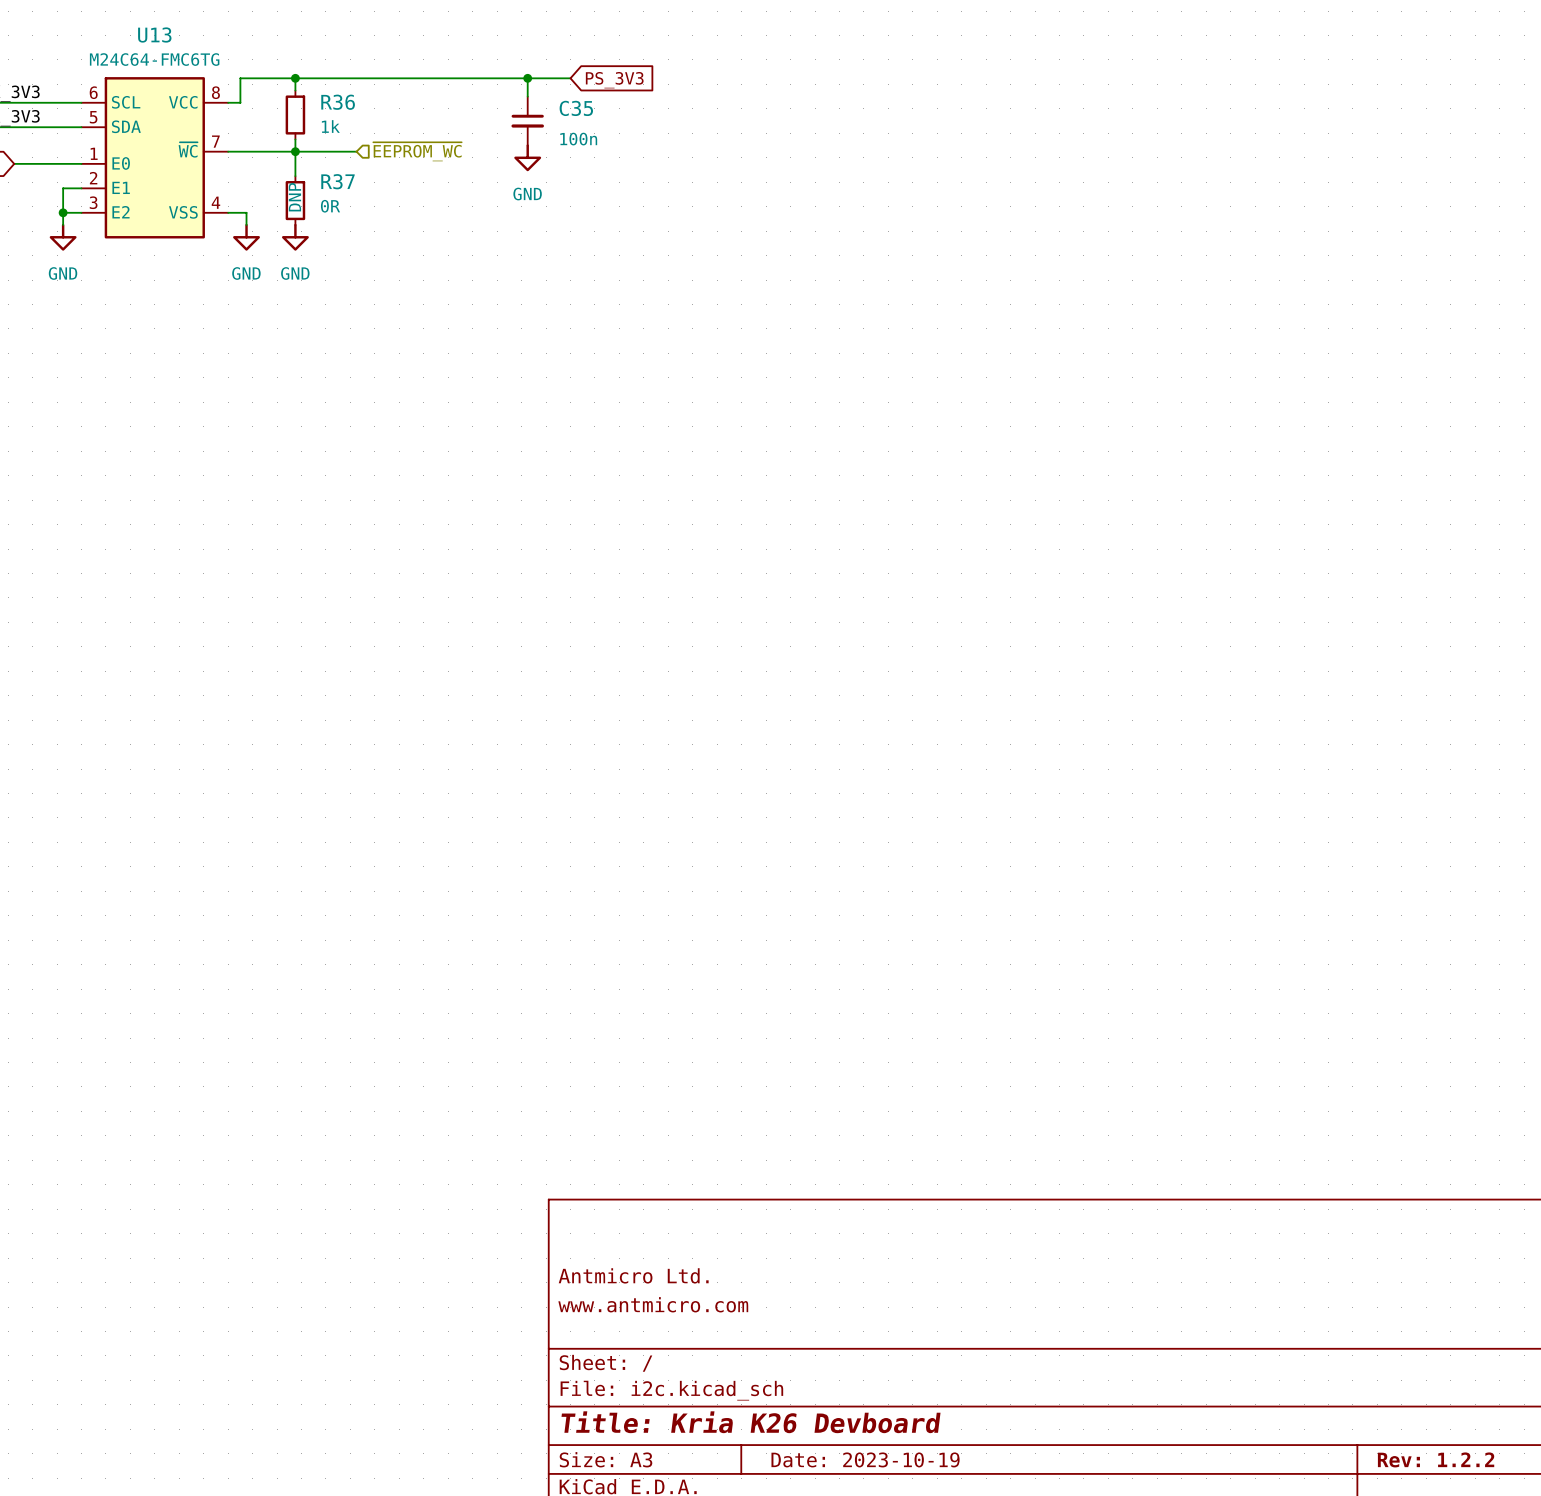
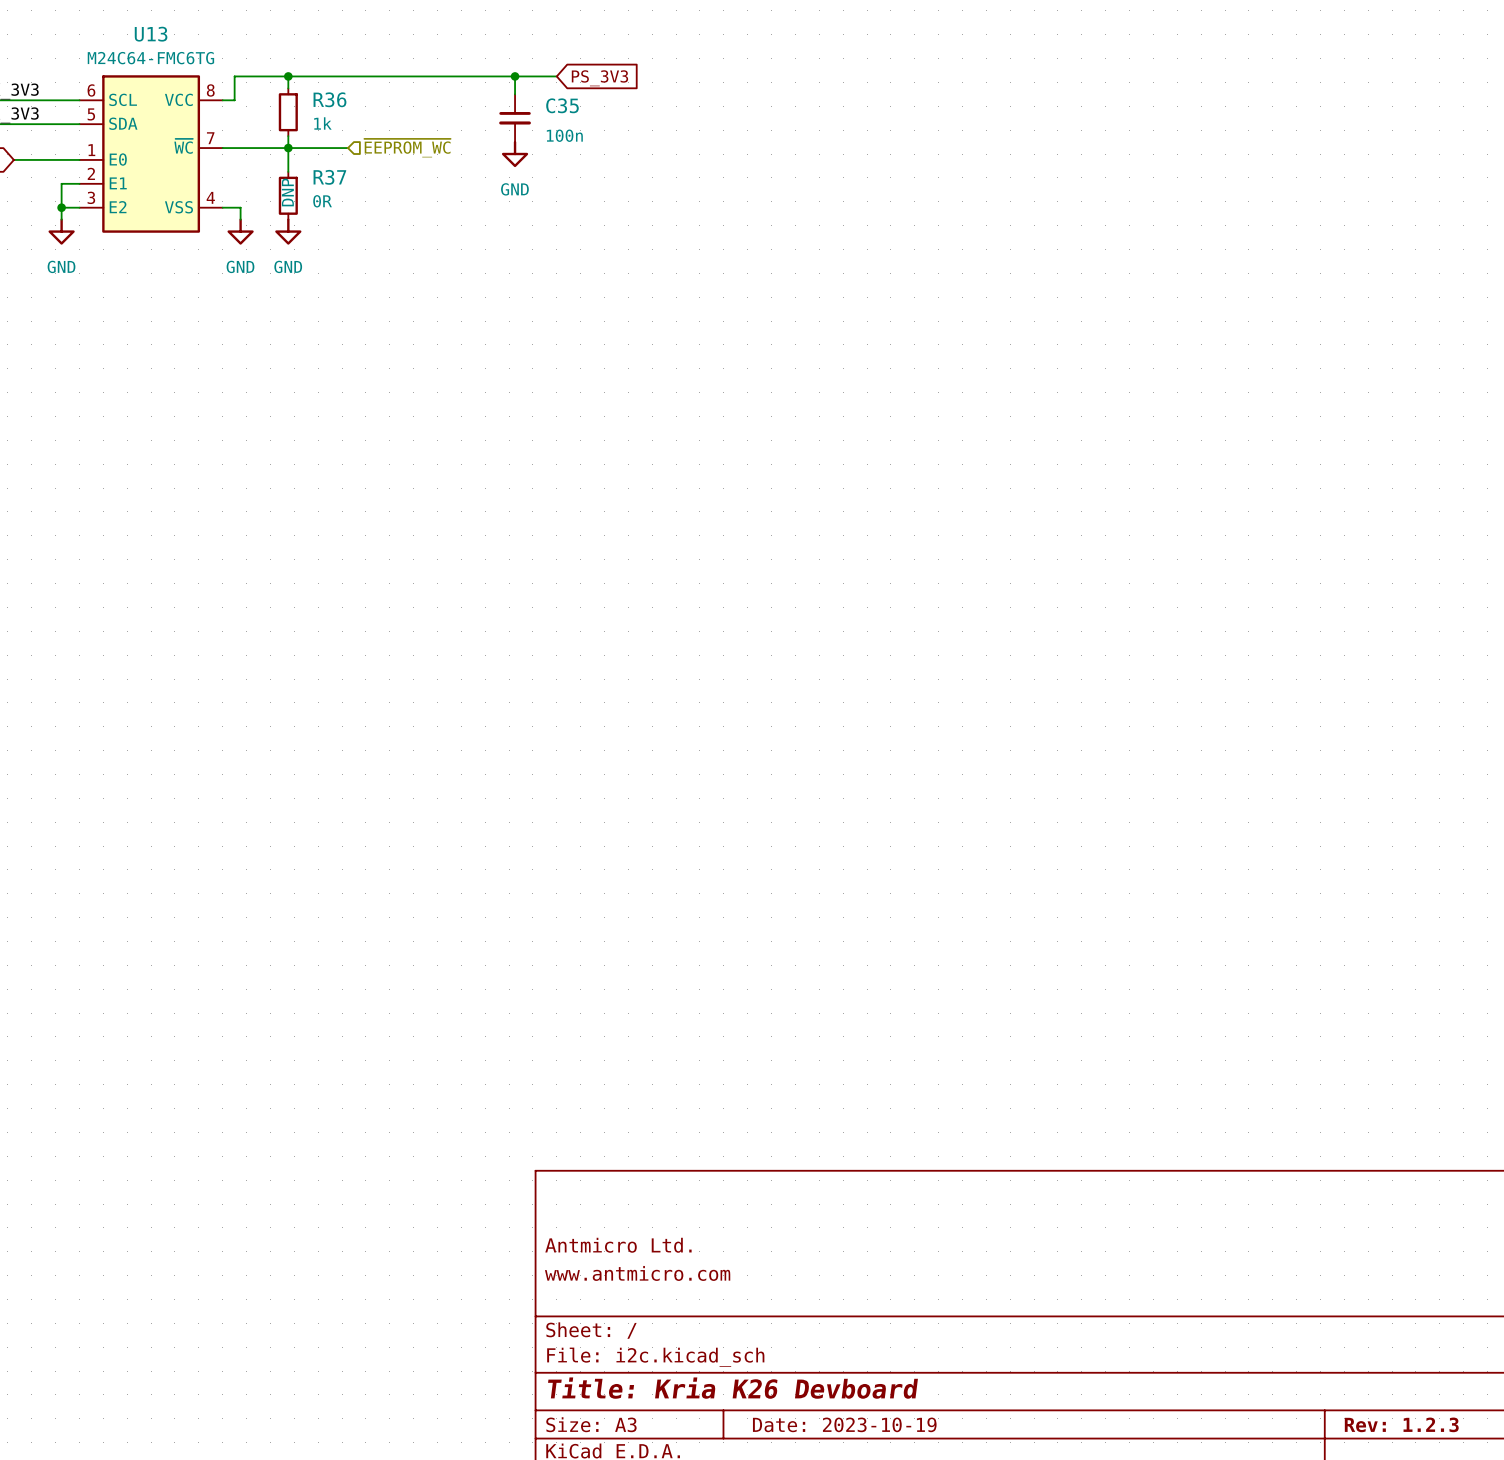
title block: Rev: 1.2.2 (1436, 1459) -> Rev: 1.2.3 (1401, 1424)

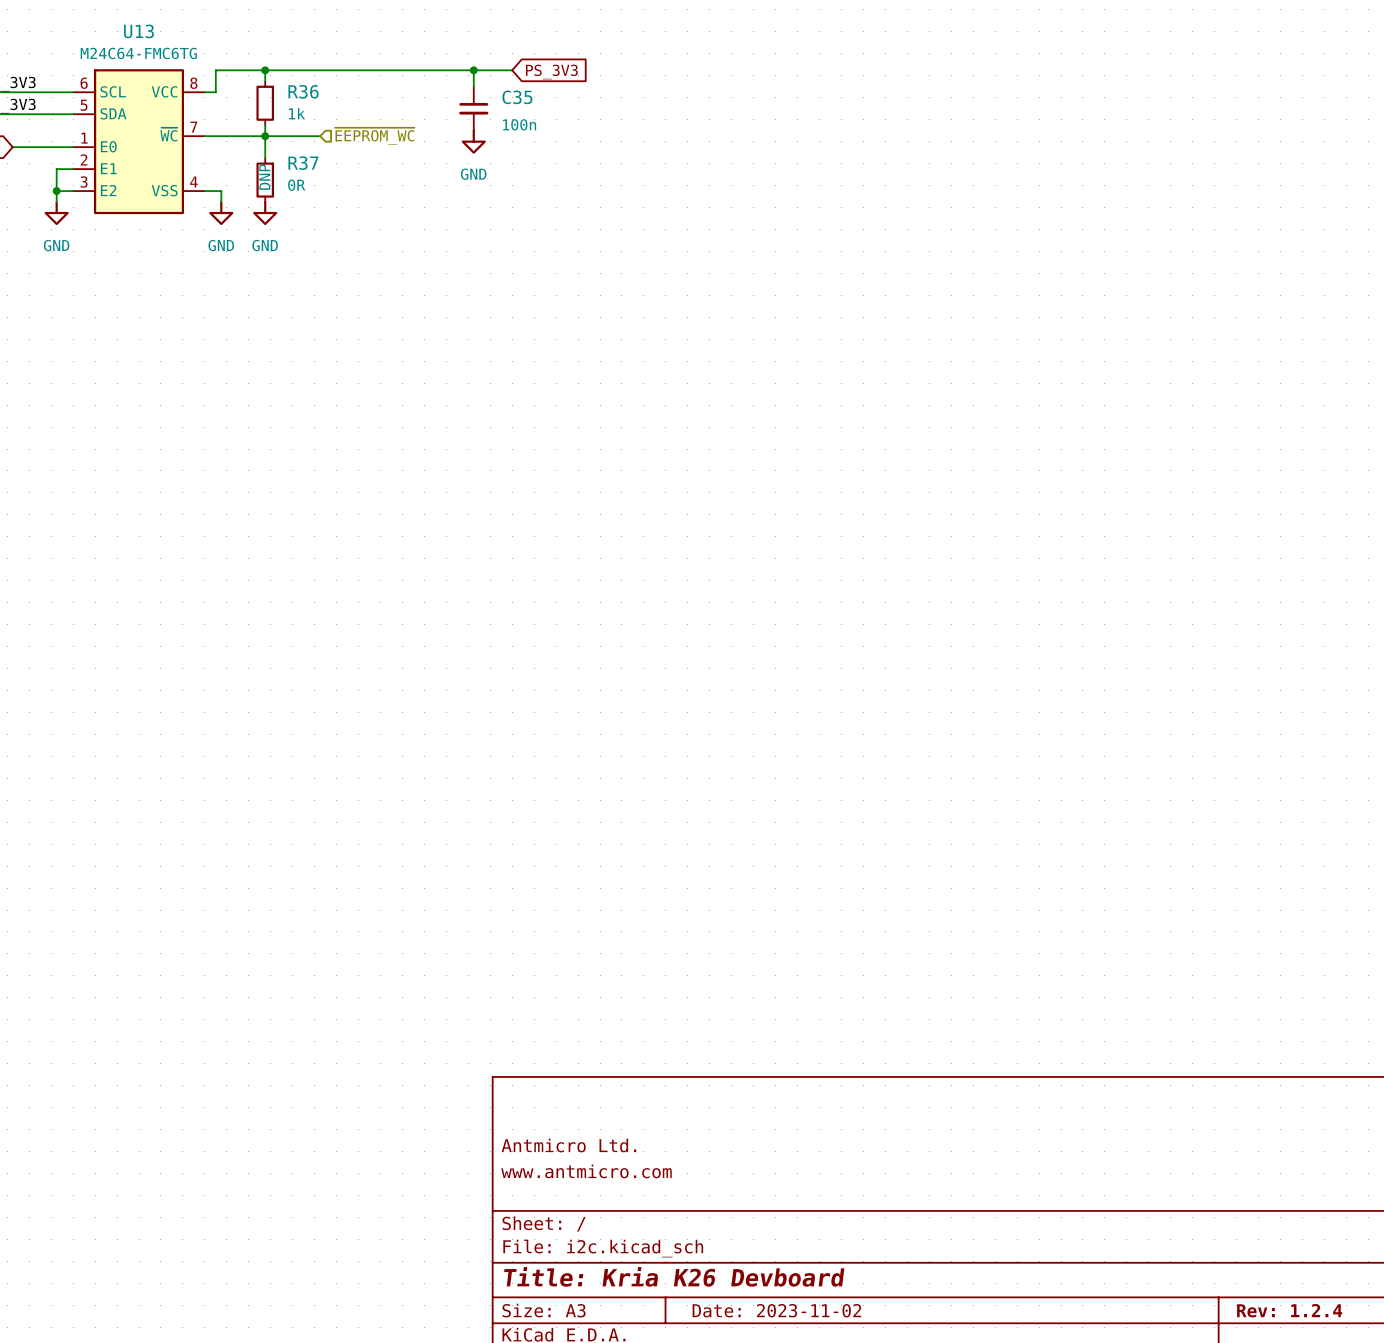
title block: Date: 2023-10-19 (844, 1424) -> Date: 2023-11-02 (776, 1310)
title block: Rev: 1.2.3 (1401, 1424) -> Rev: 1.2.4 (1289, 1310)

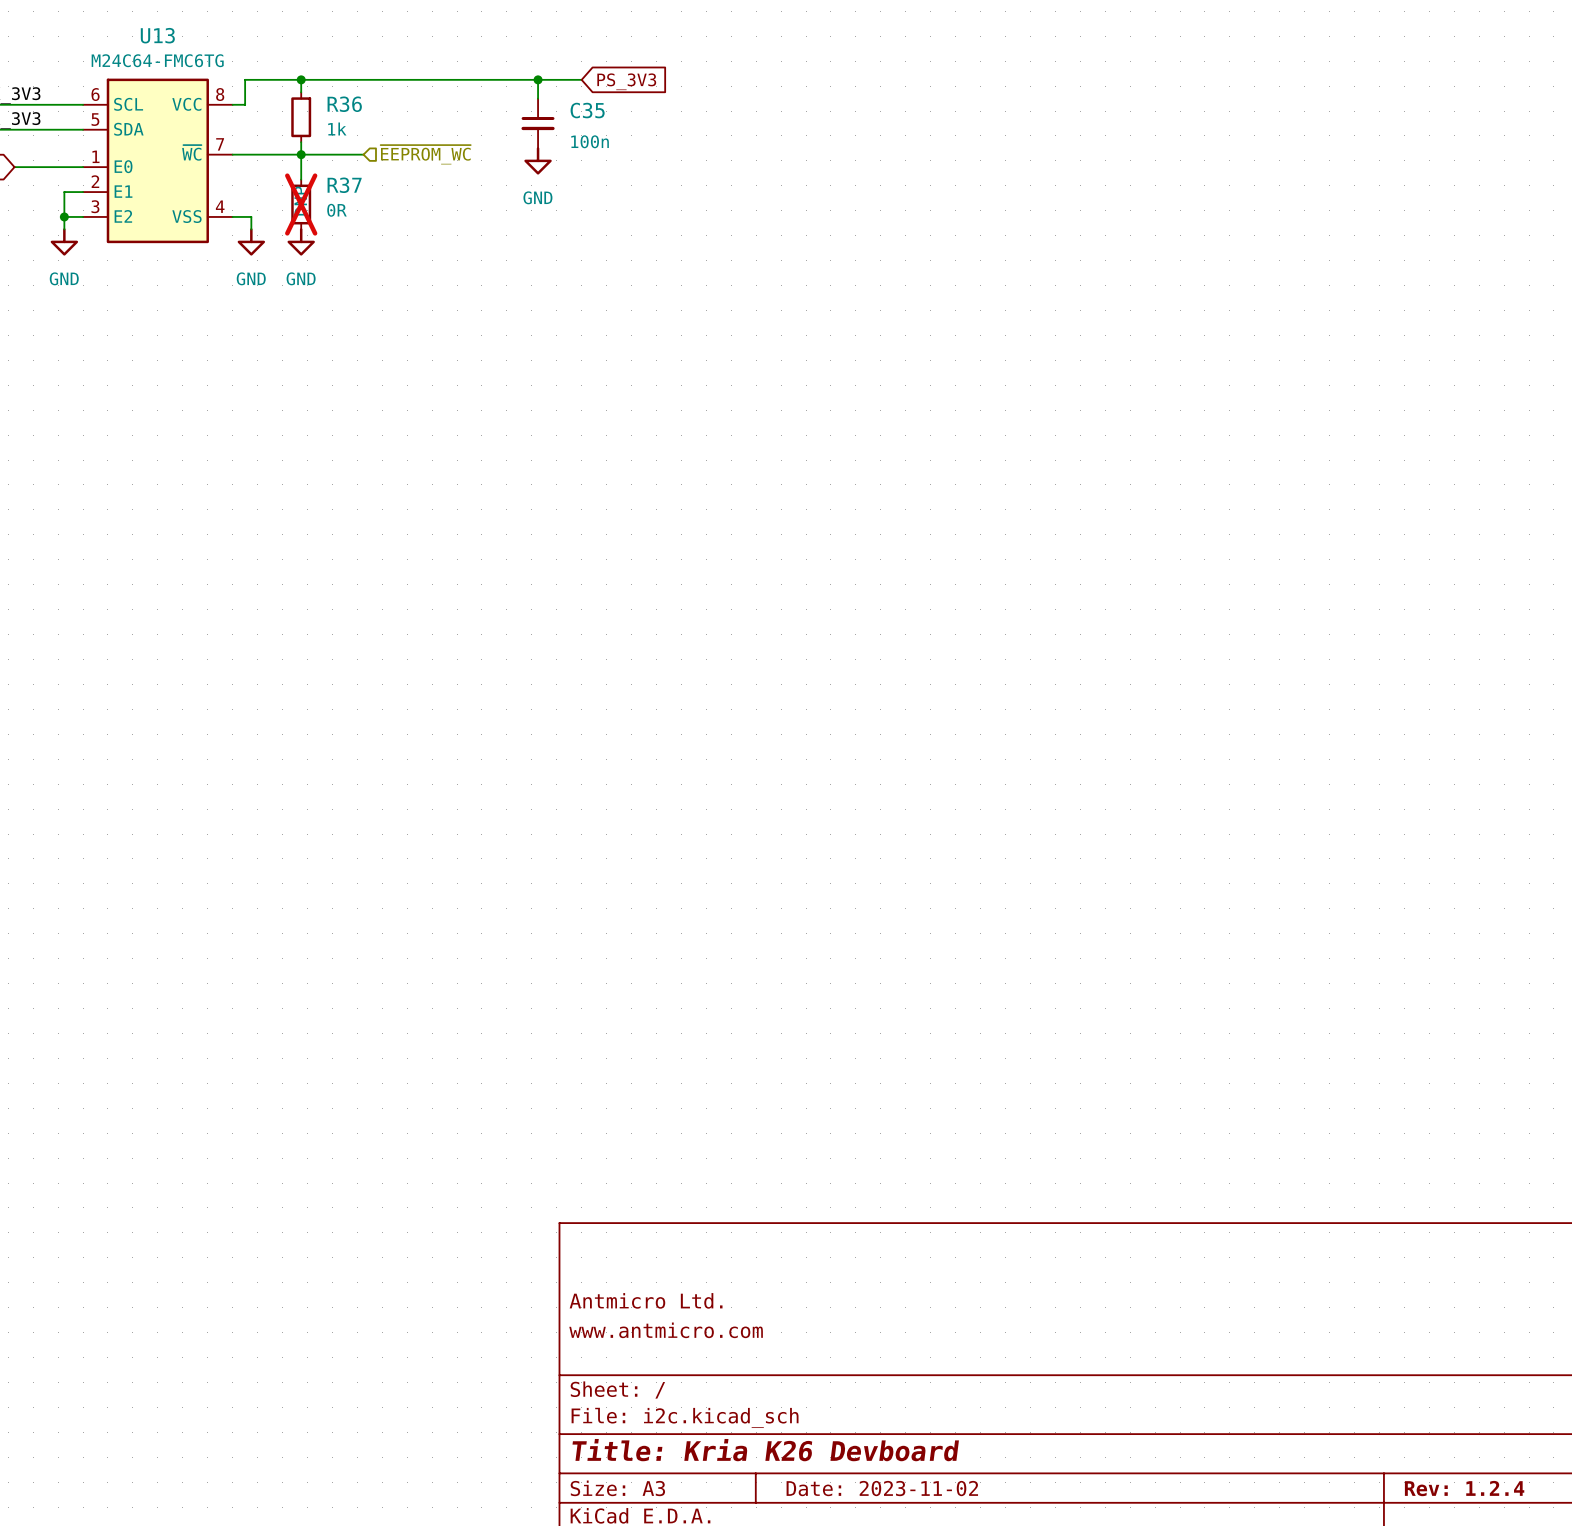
R37 do-not-place cross: none -> (301, 204)

